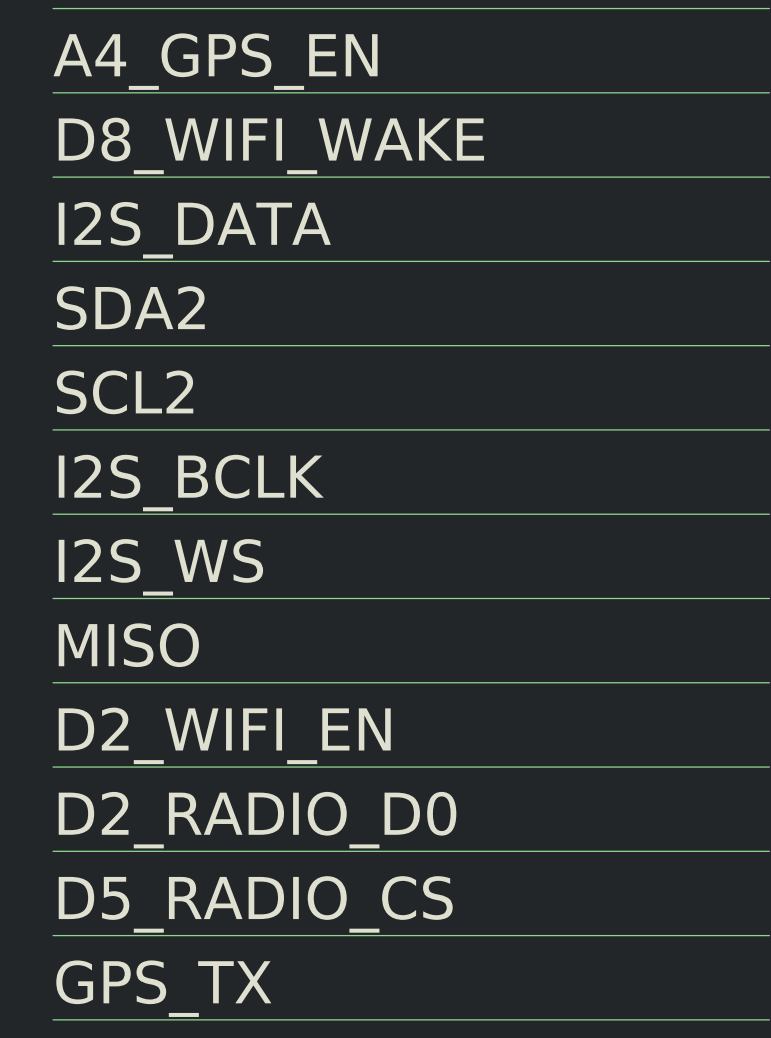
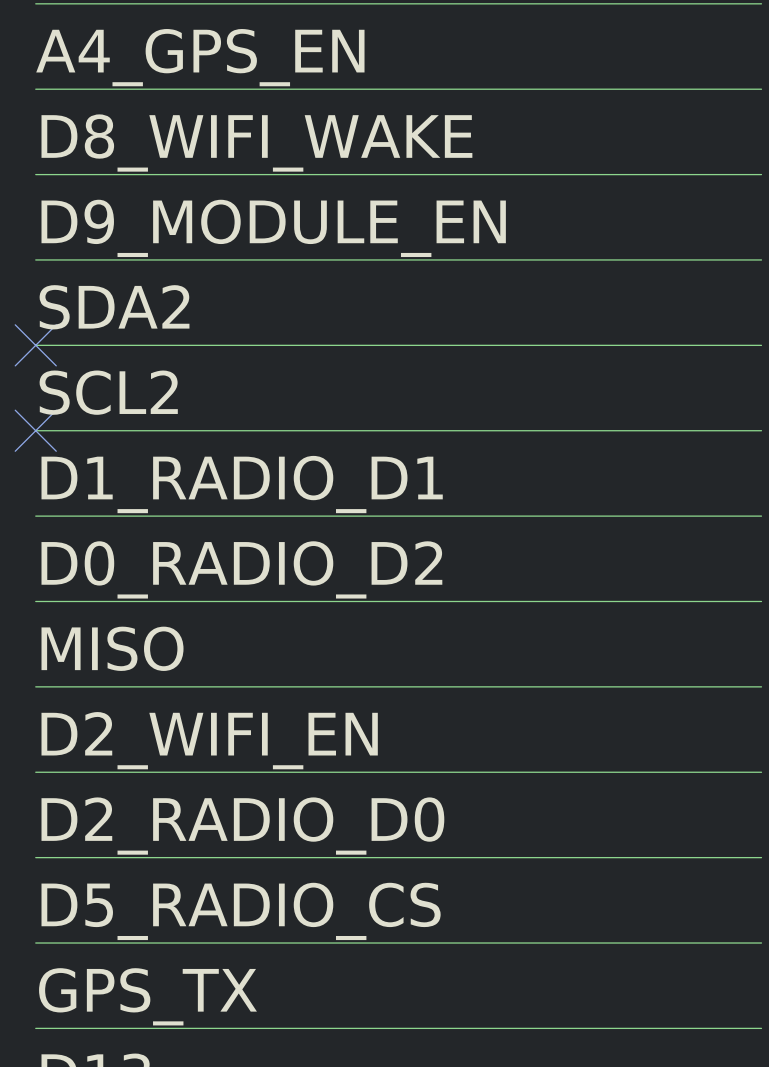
label: I2S_DATA (194, 230) -> D9_MODULE_EN (273, 228)
no-connect mark: none -> (35, 345)
no-connect mark: none -> (35, 430)
label: I2S_BCLK (191, 483) -> D1_RADIO_D1 (242, 484)
label: I2S_WS (160, 567) -> D0_RADIO_D2 (241, 569)

